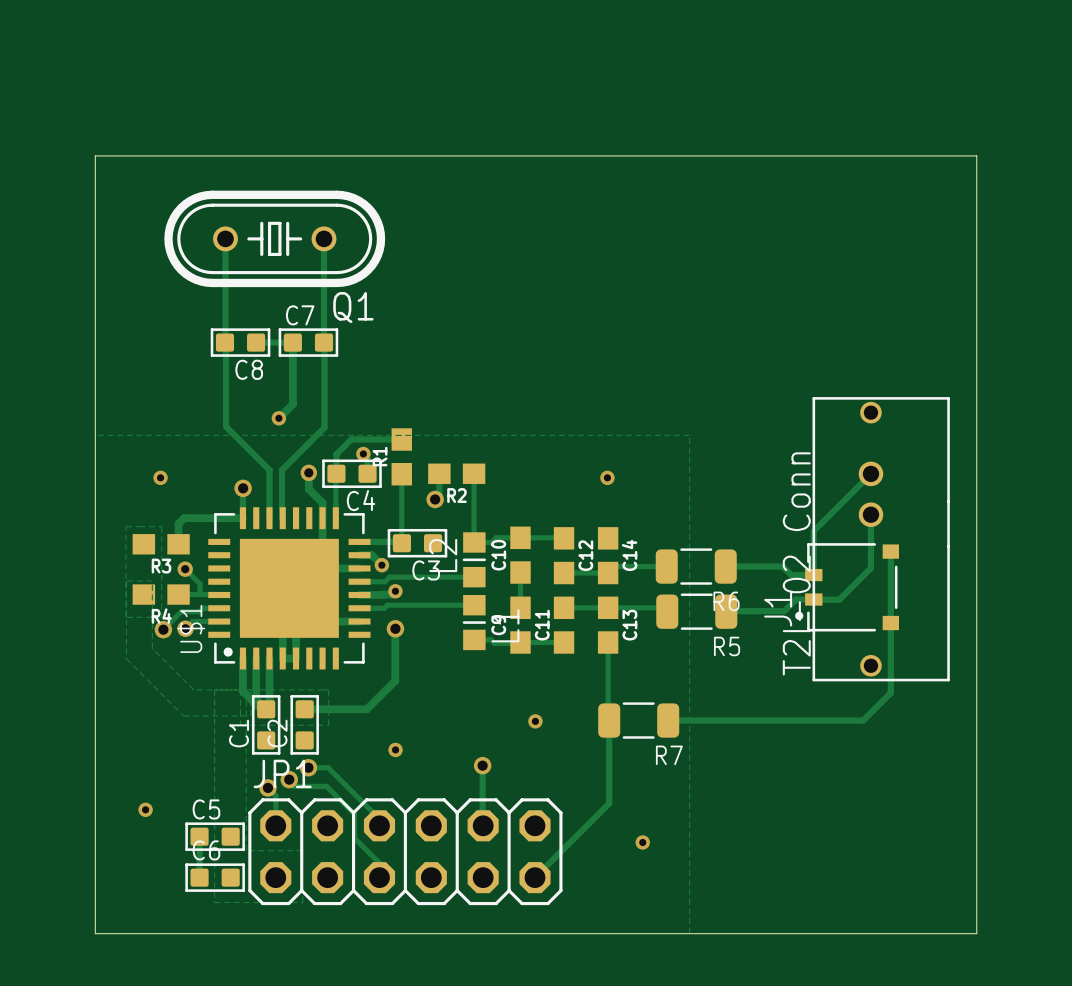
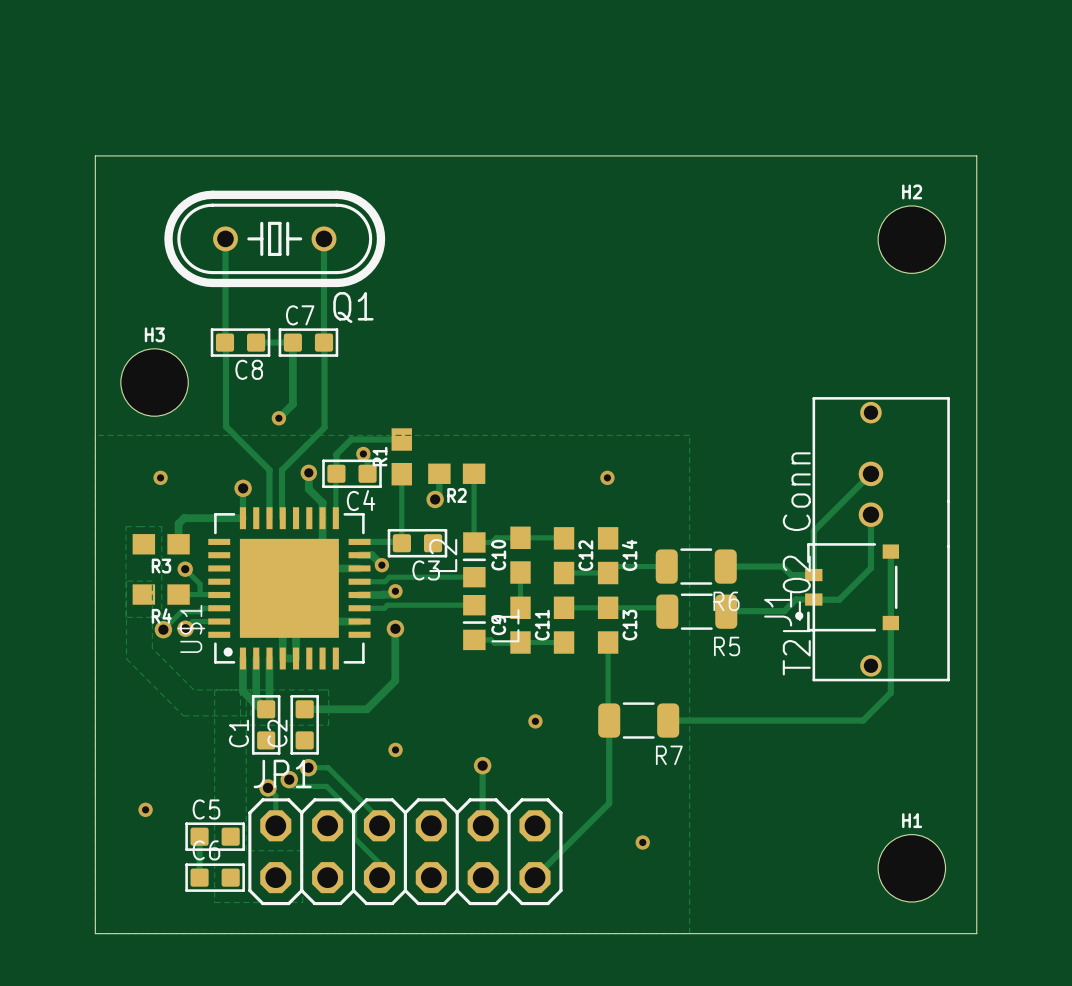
H2: none -> (911, 239)
H3: none -> (154, 382)
H1: none -> (911, 868)

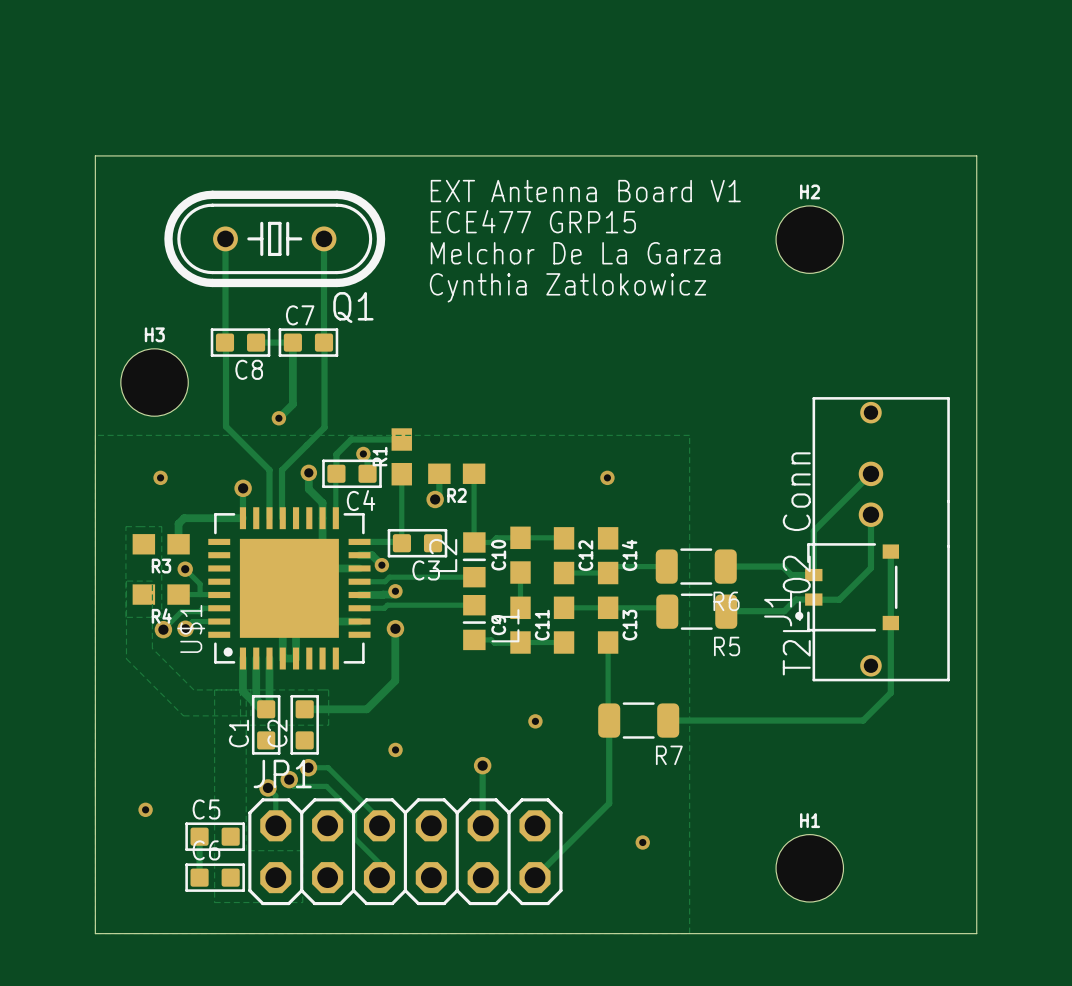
text: none -> EXT Antenna Board V1 (585, 191)
text: none -> ECE477 GRP15 (533, 221)
H2 position: (911, 239) -> (809, 239)
text: none -> Melchor De La Garza (575, 253)
text: none -> Cynthia Zatlokowicz (567, 287)
H1 position: (911, 868) -> (809, 868)

